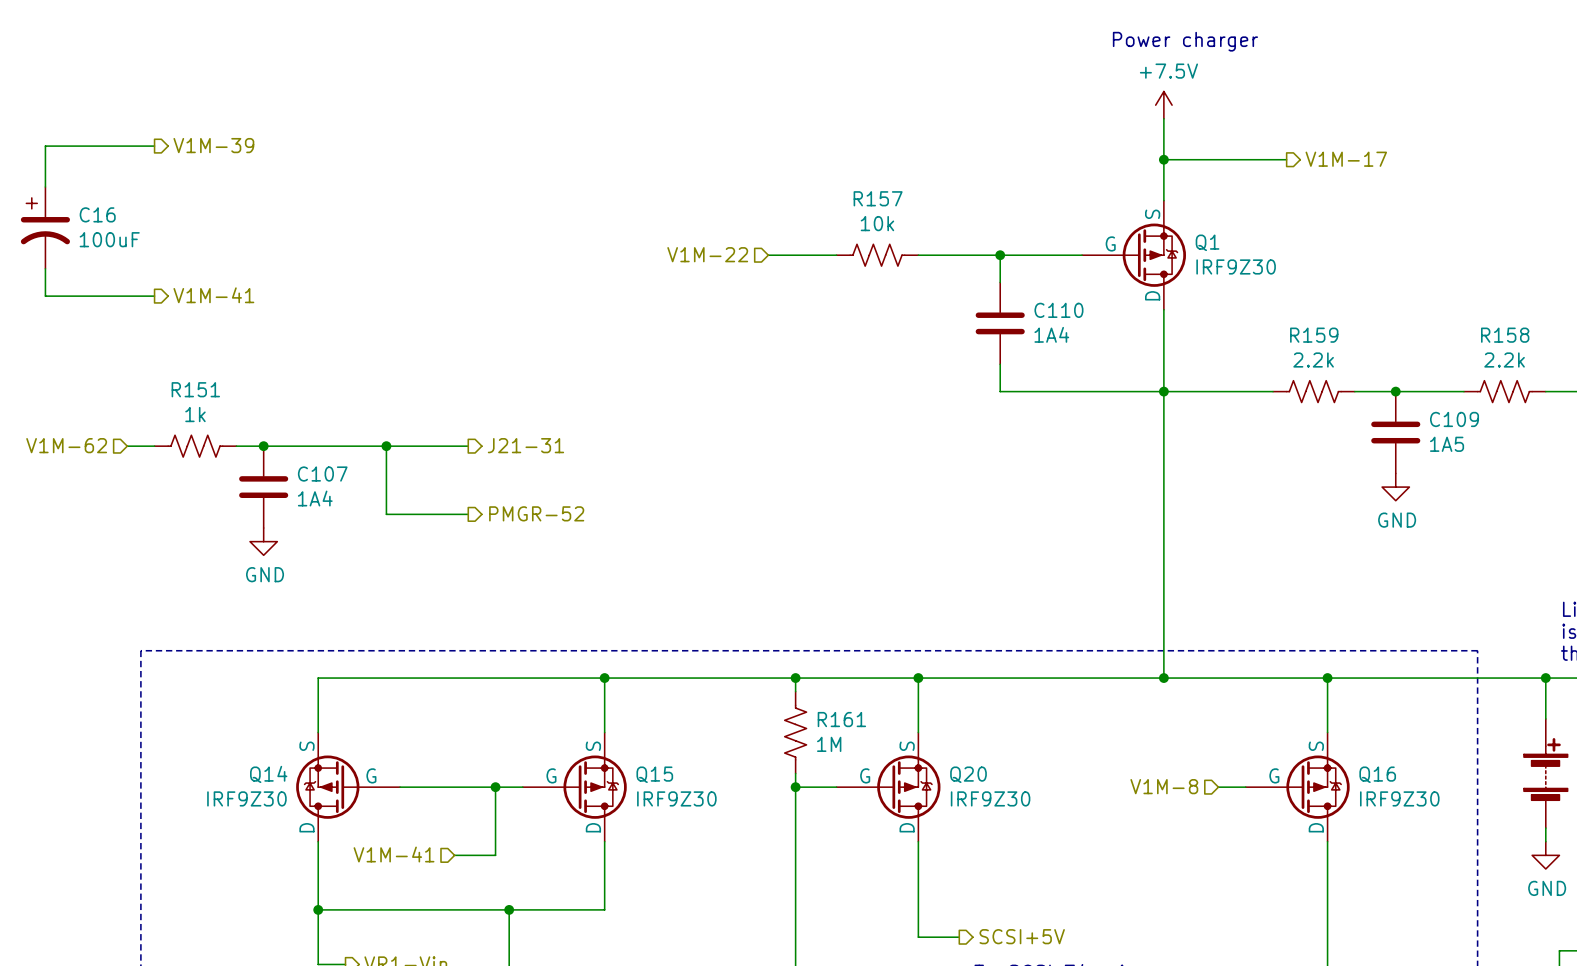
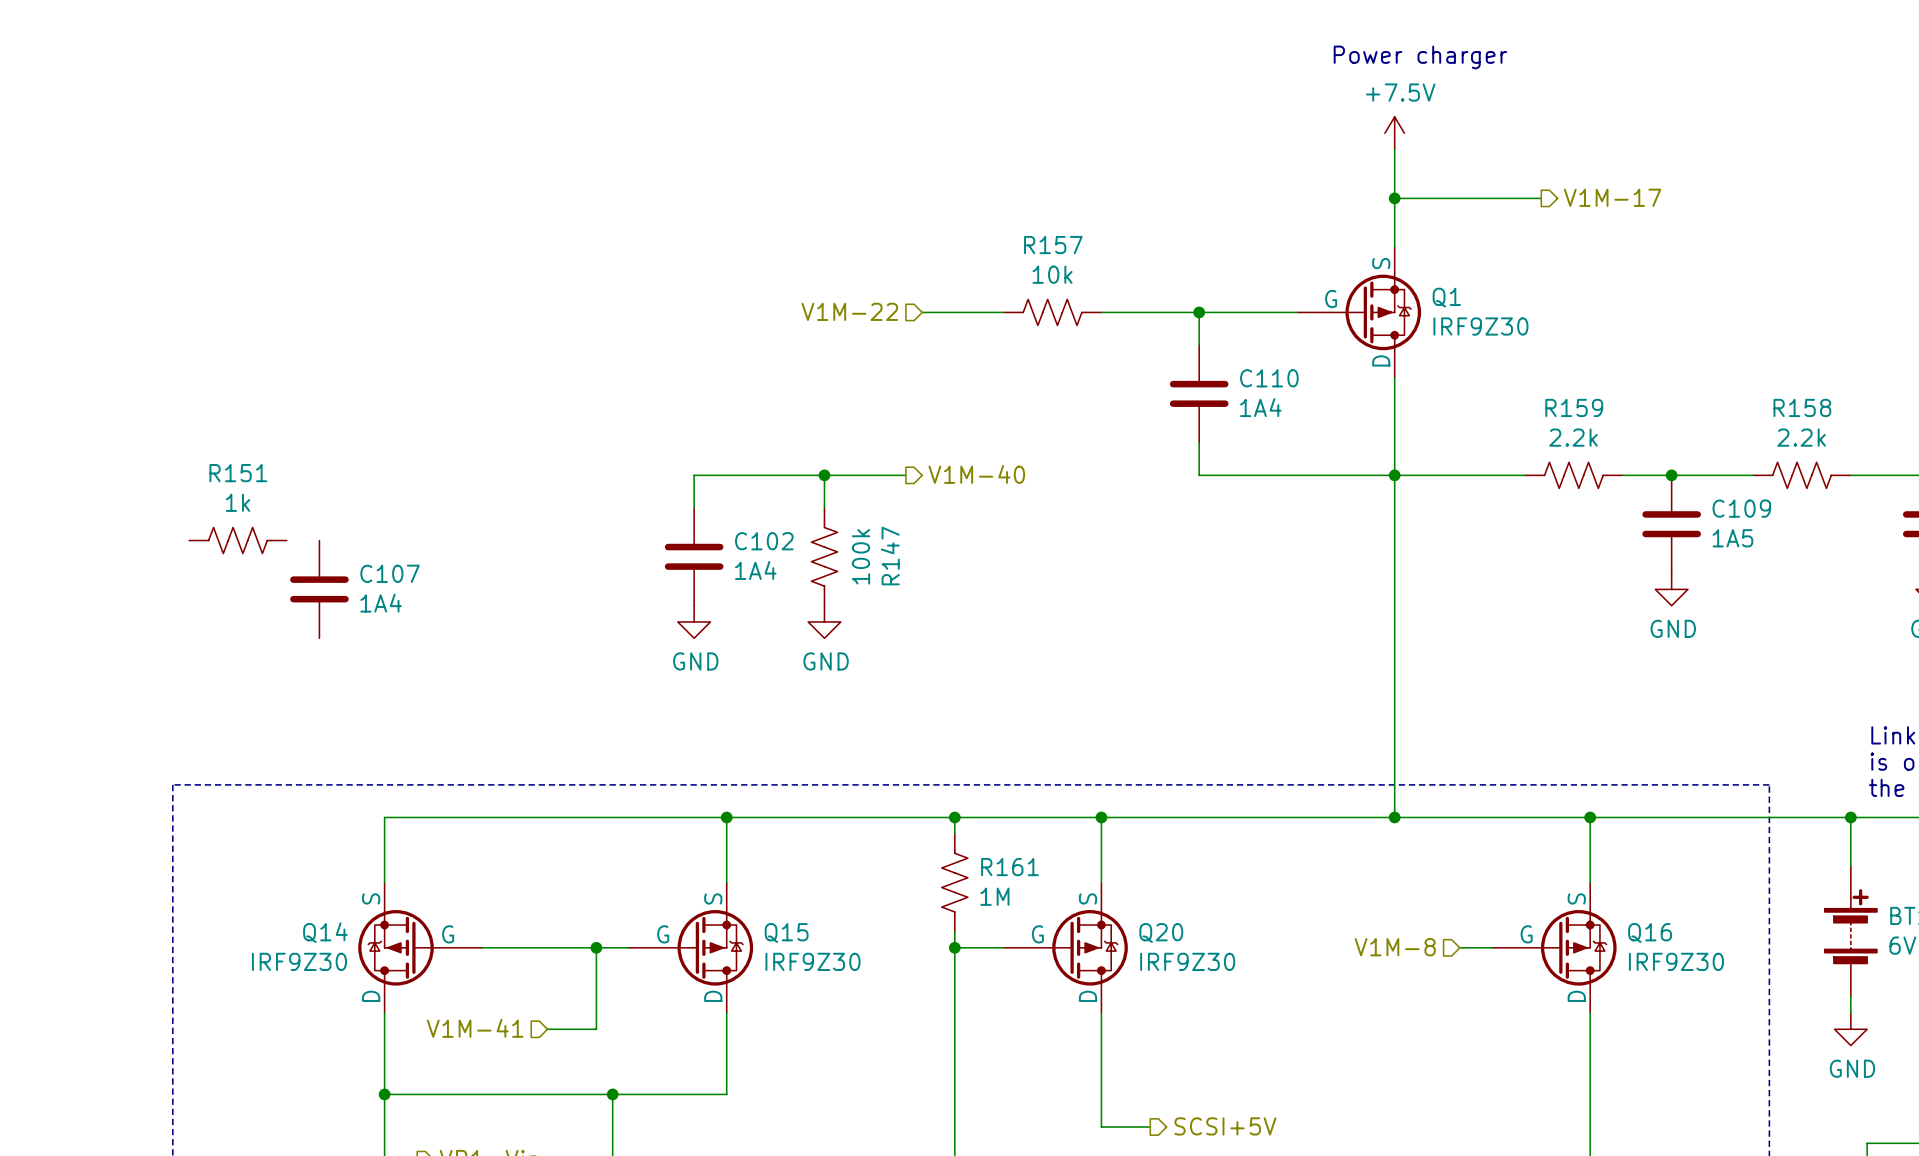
hierarchical label: V1M-39 (213, 145) -> none
wire: (154, 146) (45, 146) (45, 187) -> none
C16: 100uF (45, 227) -> none
wire: (45, 268) (45, 296) (154, 296) -> none
hierarchical label: V1M-41 (213, 295) -> none
hierarchical label: none -> V1M-40 (976, 474)
wire: none -> (824, 475) (824, 507)
junction: none -> (824, 475)
wire: none -> (905, 475) (694, 475) (694, 507)
hierarchical label: V1M-62 (66, 445) -> none
hierarchical label: J21-31 (525, 445) -> none
wire: (127, 446) (154, 446) -> none
wire: (236, 446) (468, 446) -> none
junction: (263, 446) -> none
wire: (386, 446) (386, 514) (468, 514) -> none
junction: (386, 446) -> none
C102: none -> 1A4 (694, 556)
R147: none -> 100k (824, 556)
hierarchical label: PMGR-52 (536, 513) -> none
power symbol: none -> GND (694, 621)
power symbol: none -> GND (824, 621)
power symbol: GND (263, 541) -> none

